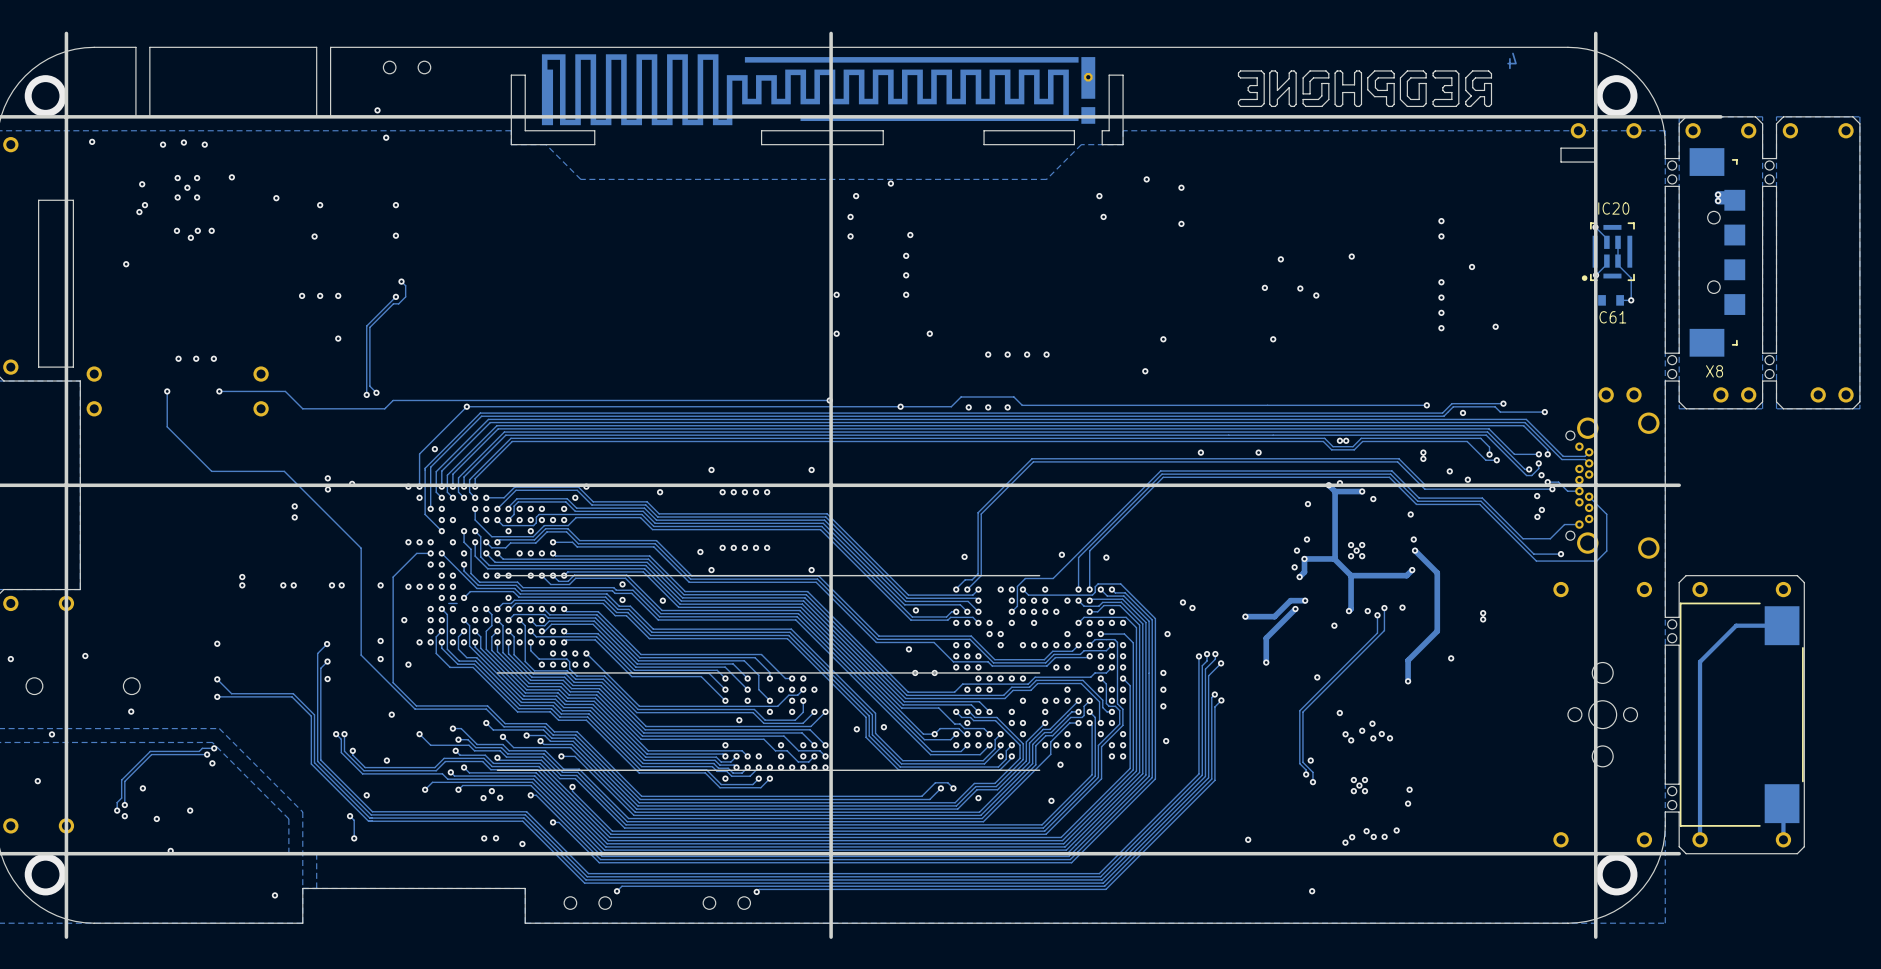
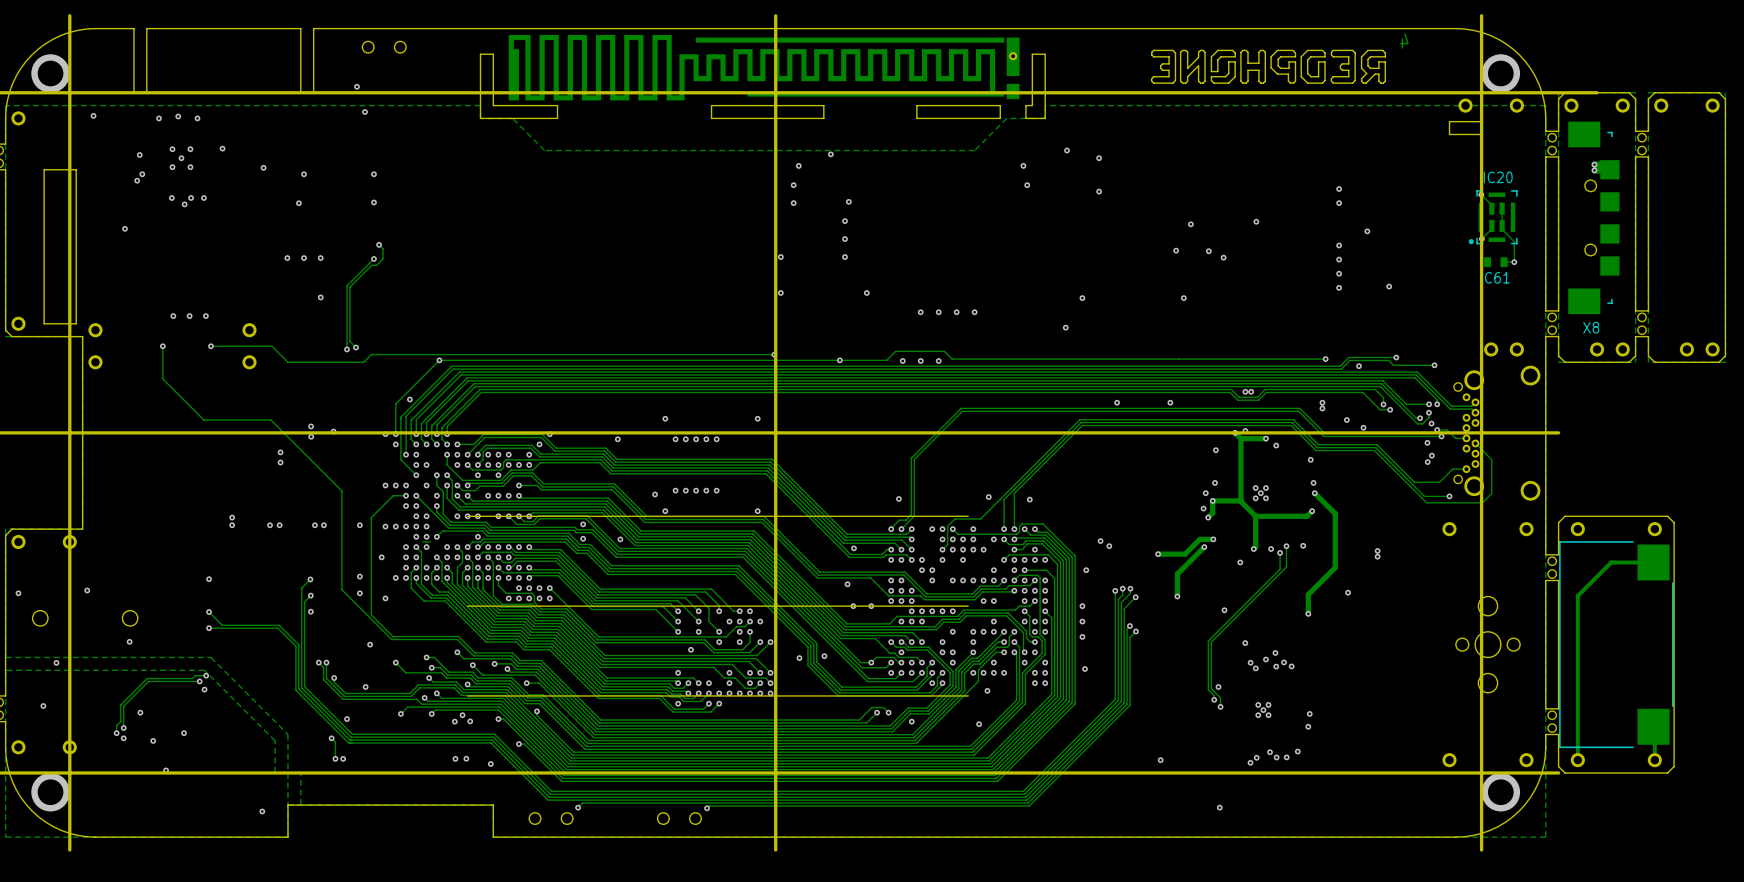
via: none -> (343, 758)

